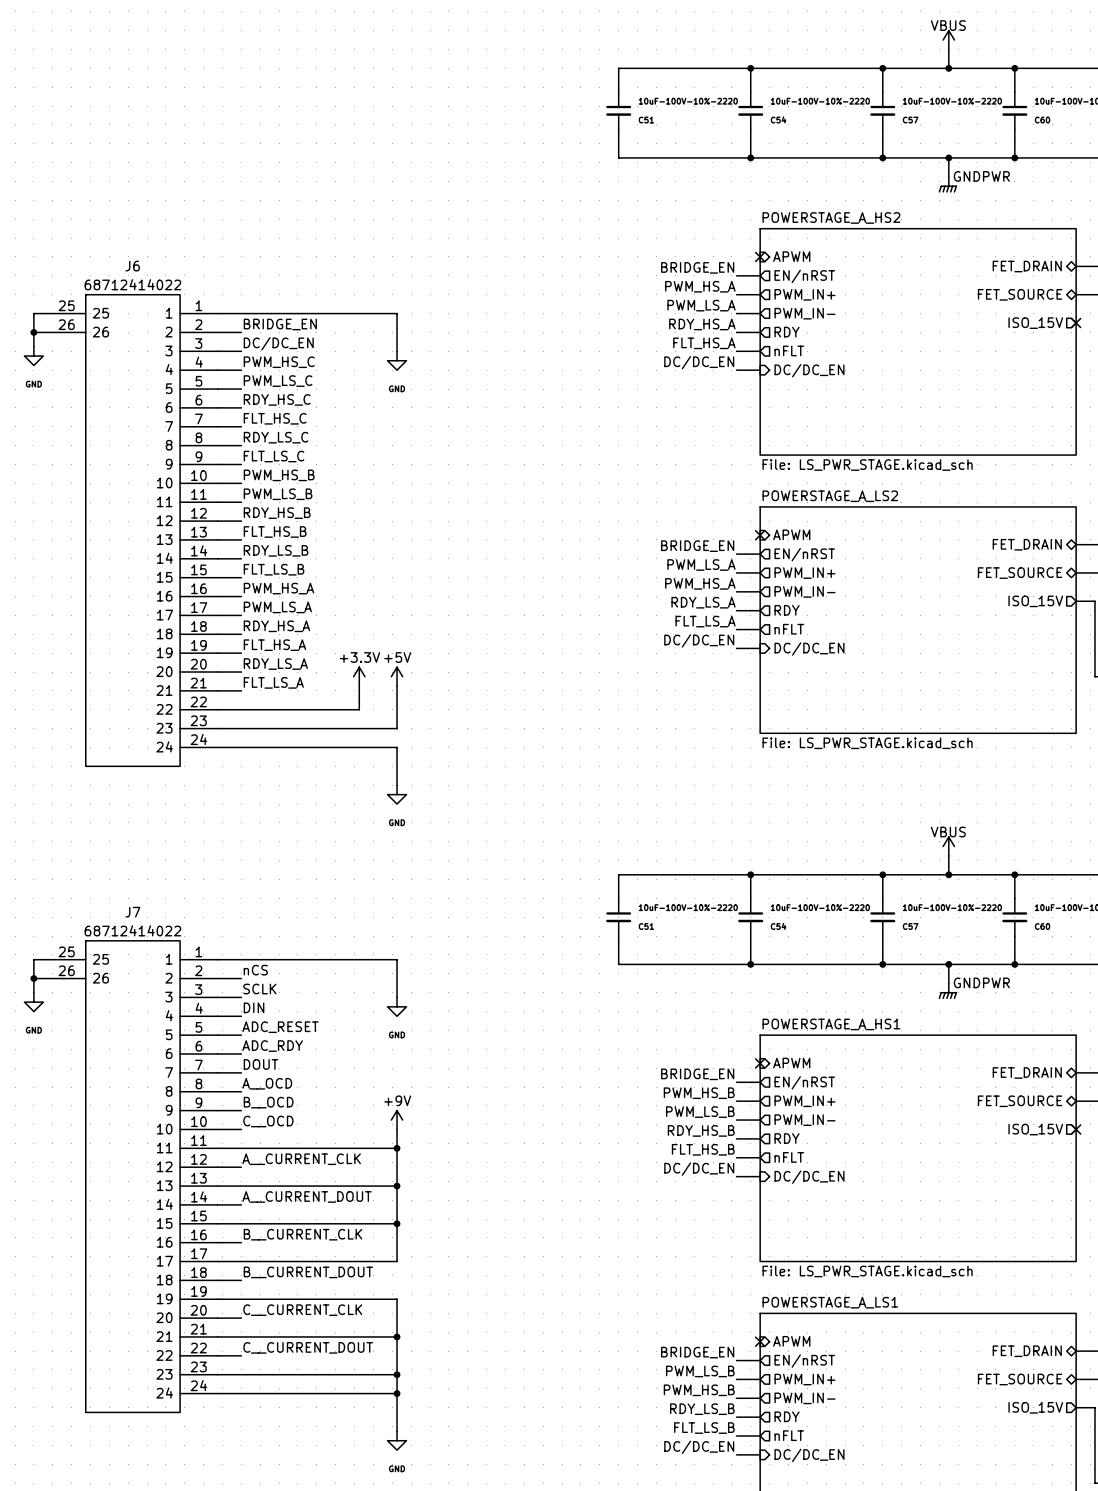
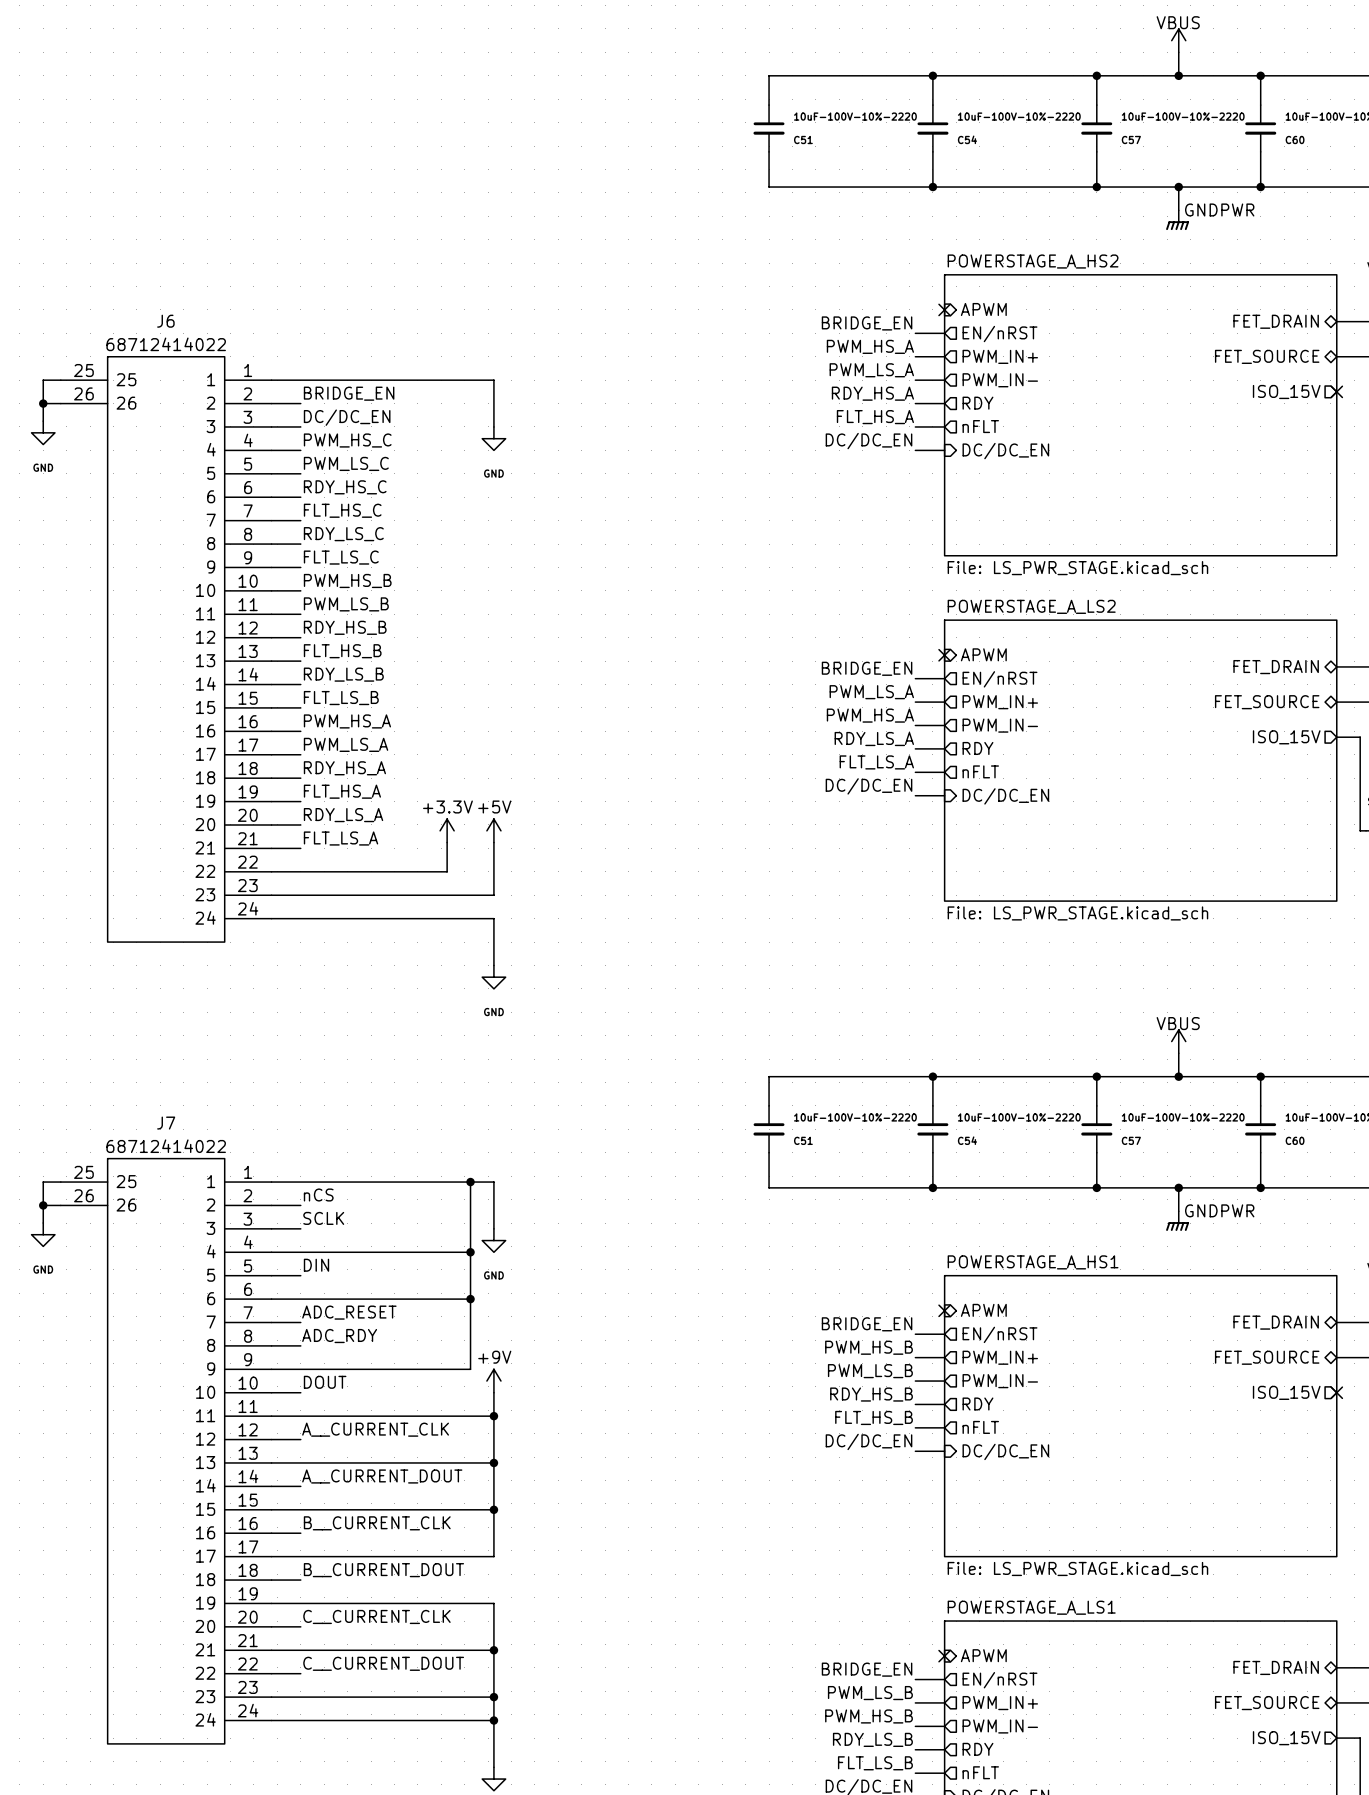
wire: none -> (470, 1182) (470, 1369) (300, 1369)
junction: none -> (470, 1182)
label: DIN (254, 1007) -> none
wire: none -> (300, 1252) (470, 1252)
junction: none -> (470, 1252)
label: ADC_RESET (280, 1027) -> DIN (316, 1265)
label: ADC_RDY (272, 1046) -> none
wire: none -> (300, 1299) (470, 1299)
junction: none -> (470, 1299)
label: DOUT (261, 1064) -> ADC_RESET (349, 1312)
label: A__OCD (267, 1083) -> ADC_RDY (339, 1336)
label: B__OCD (268, 1102) -> none
label: C__OCD (268, 1121) -> DOUT (325, 1382)

